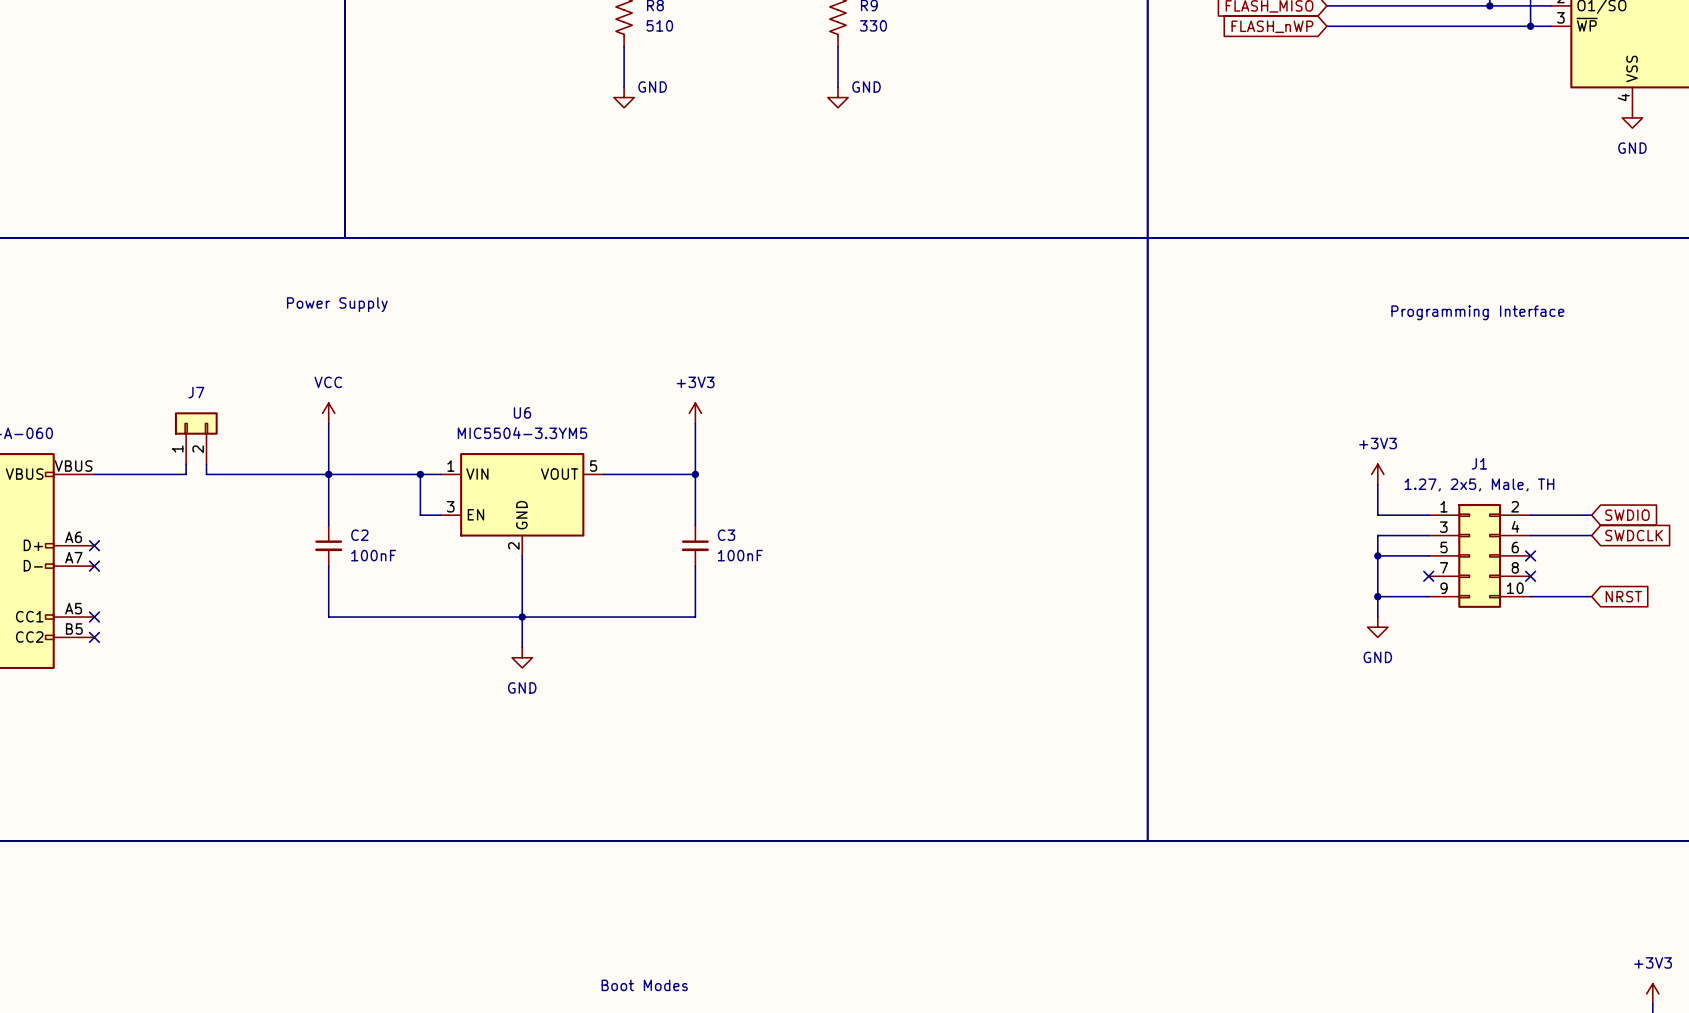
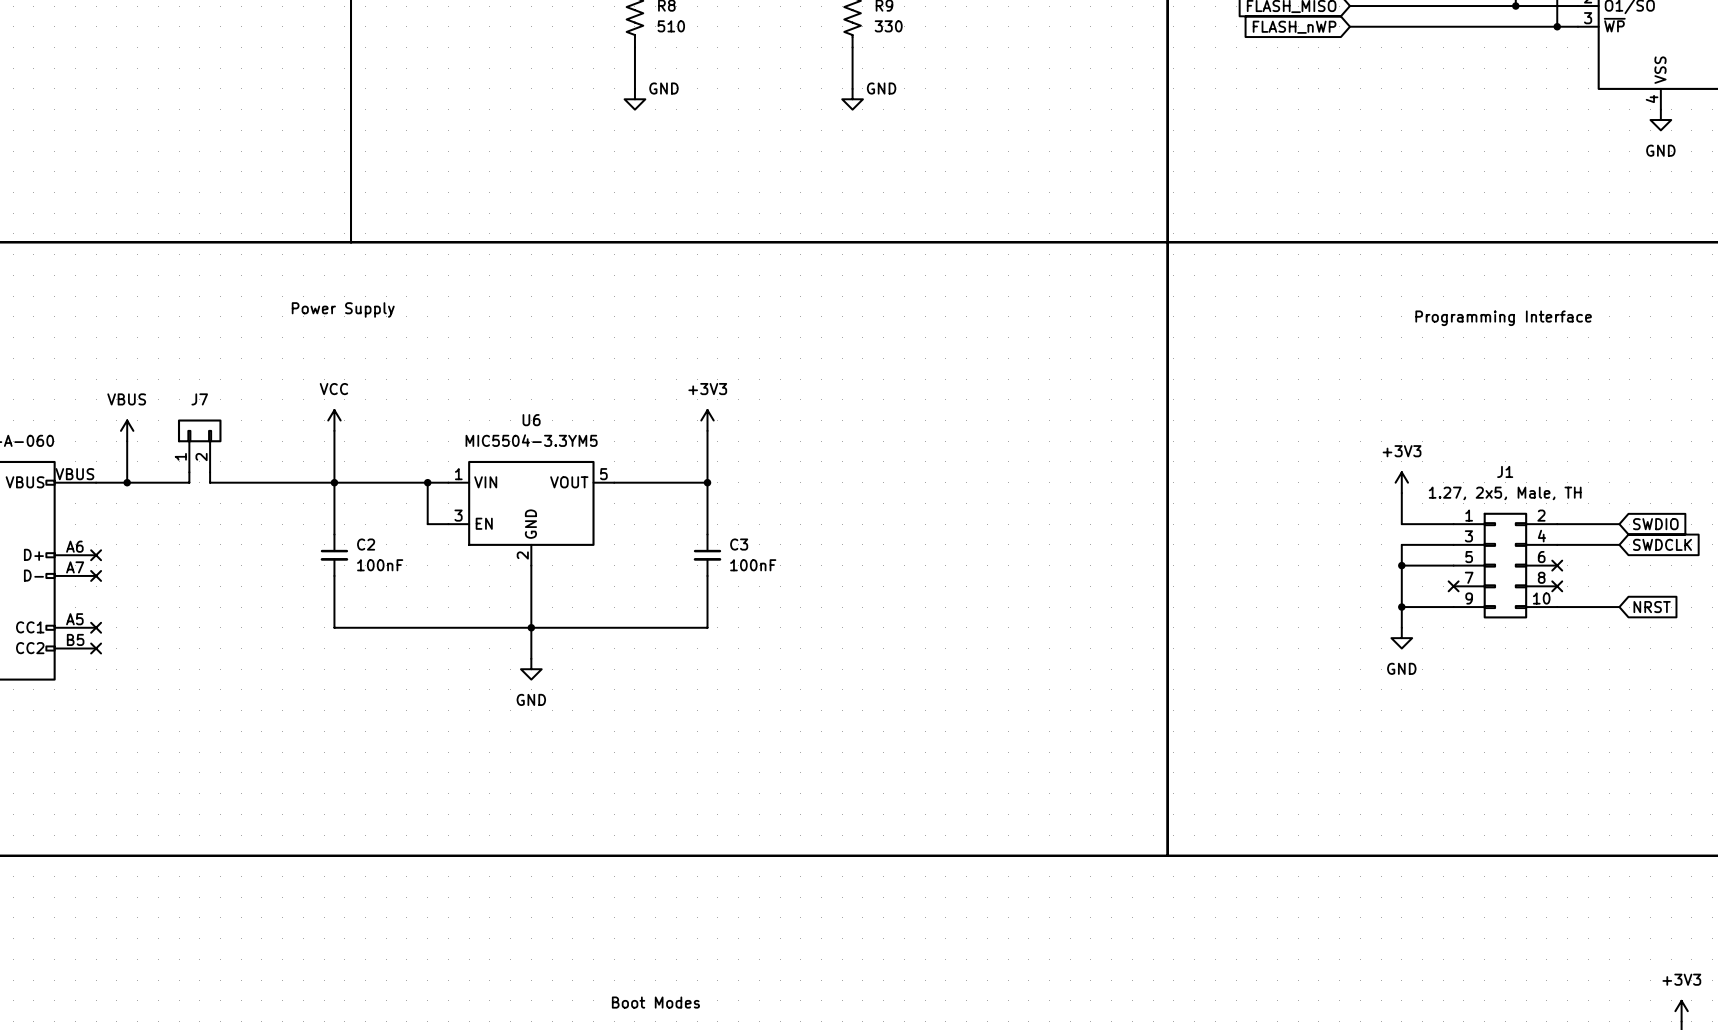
power symbol: none -> VBUS (127, 430)
wire: none -> (127, 441) (127, 482)
junction: none -> (127, 482)

